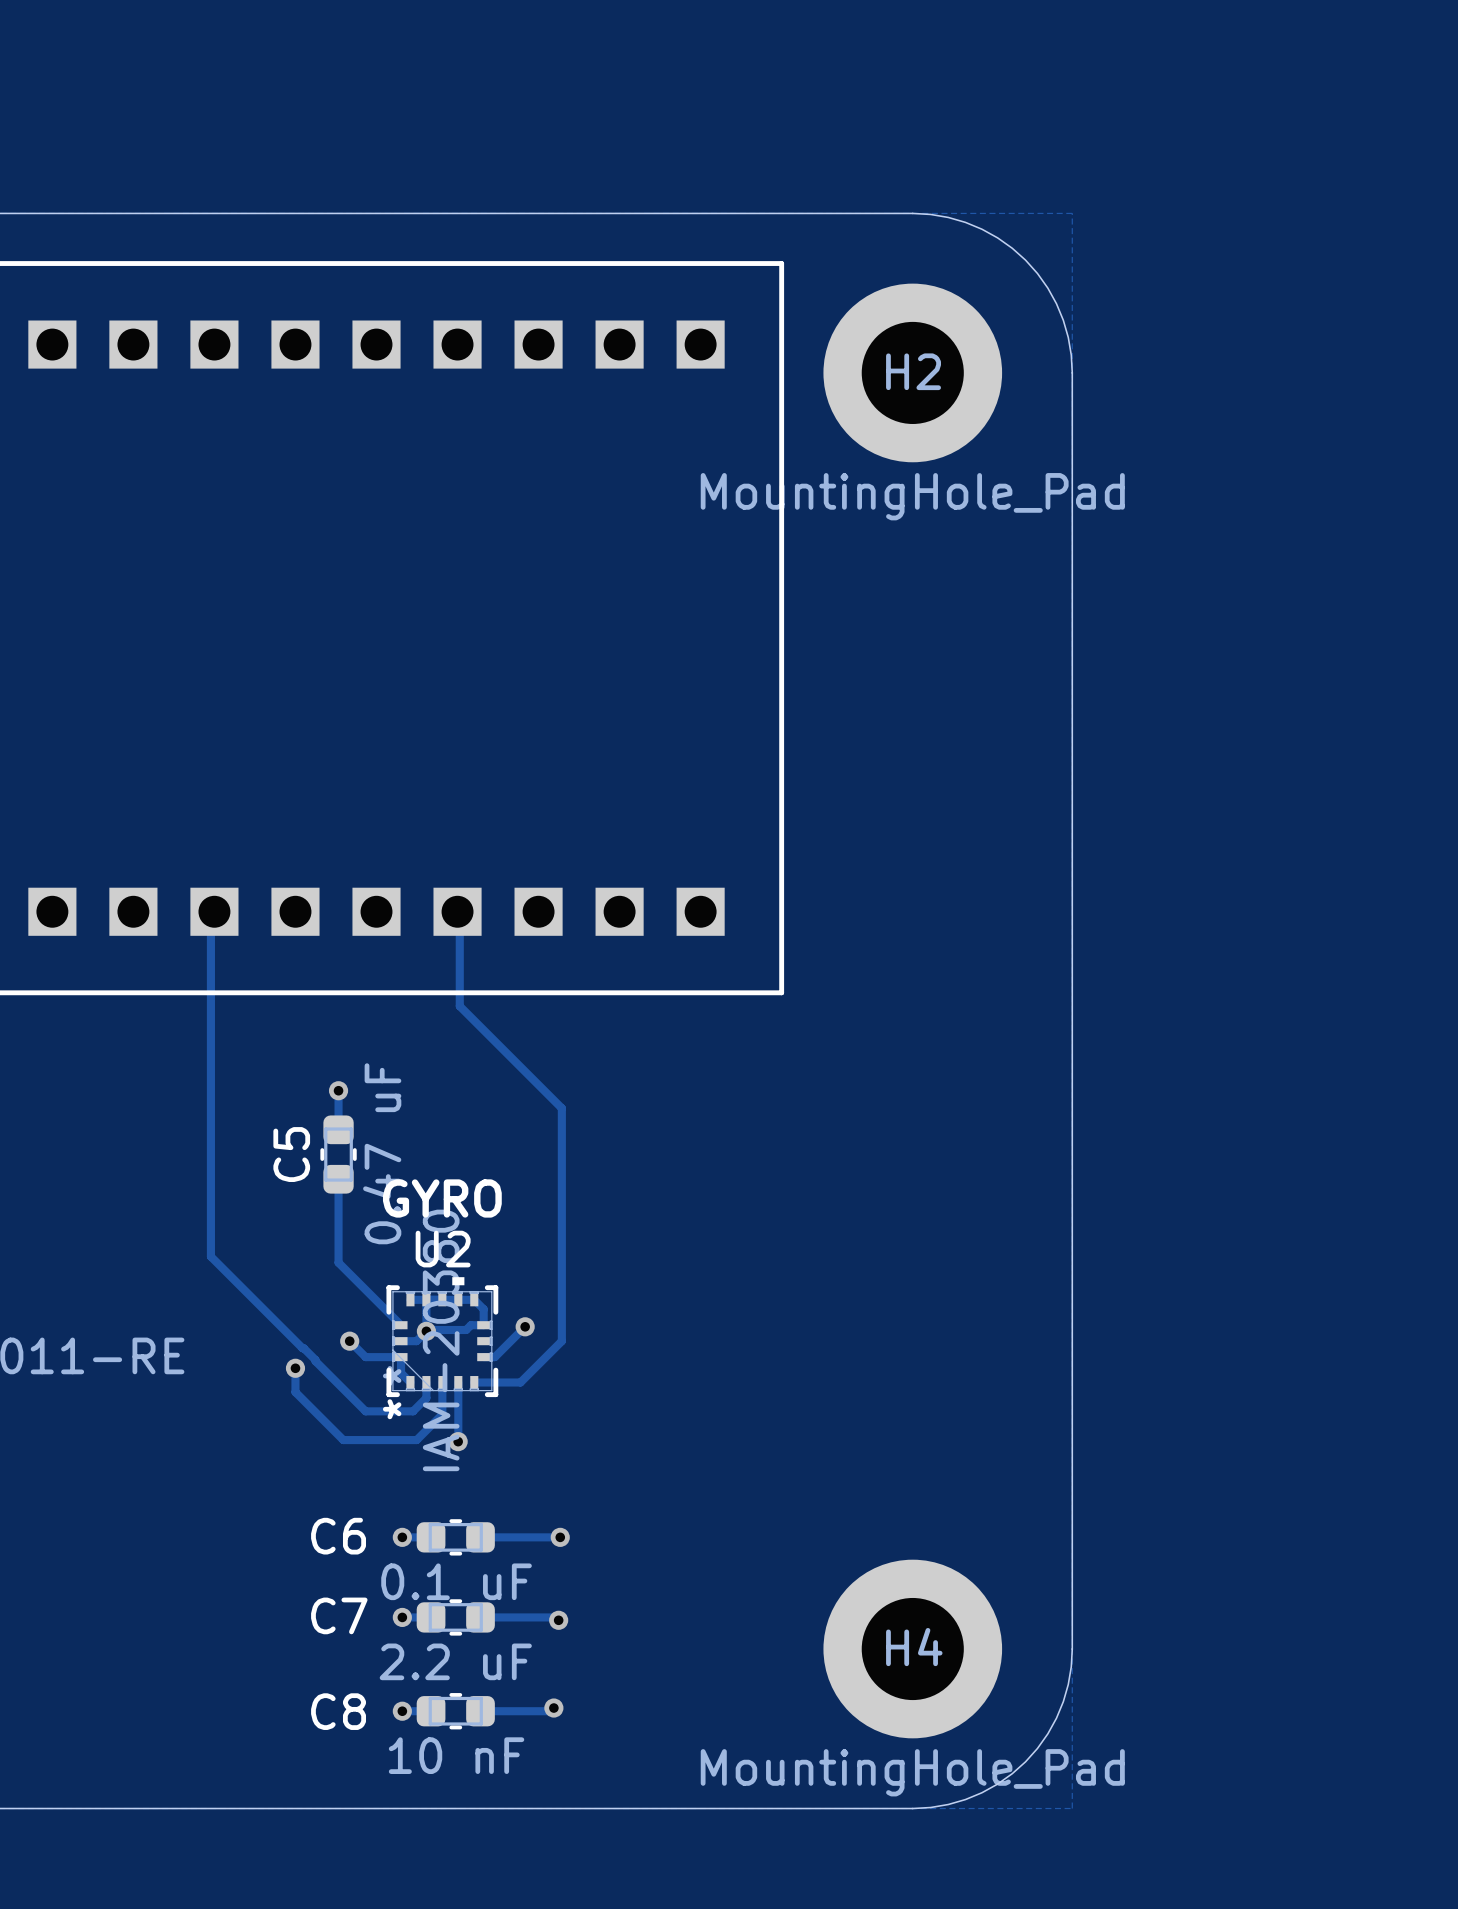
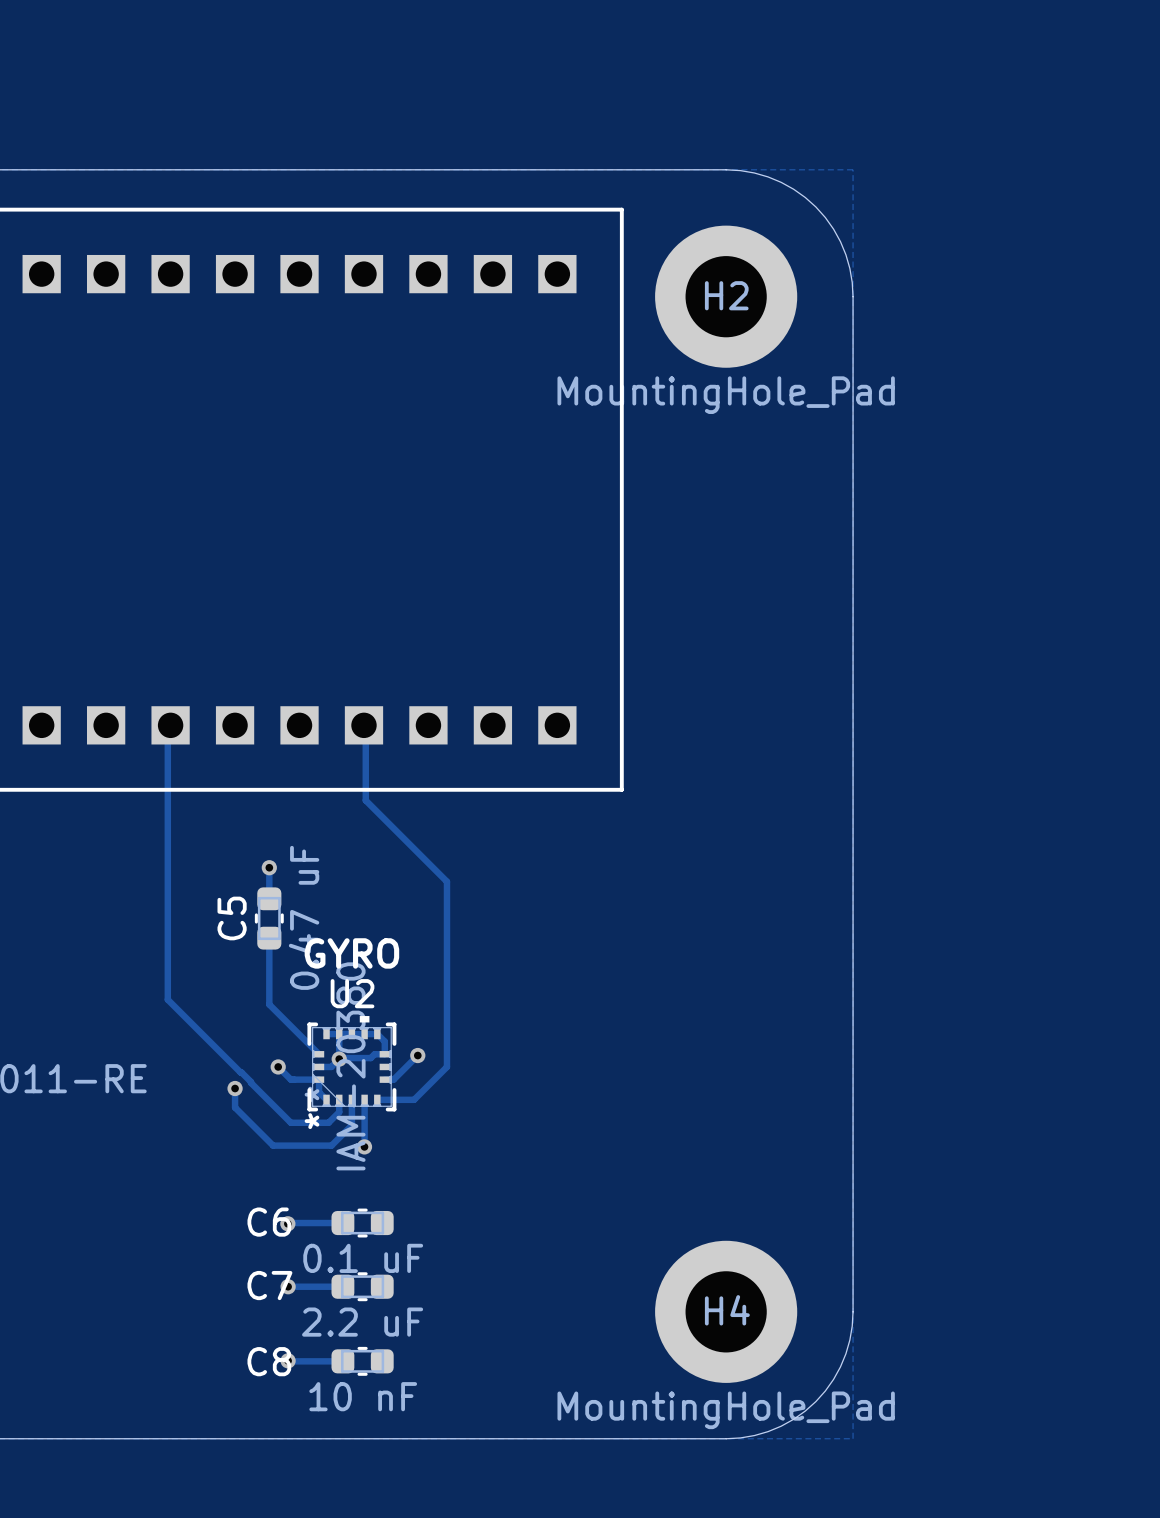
track: none -> (320, 1223) (287, 1223)
via position: (402, 1537) -> (287, 1223)
track: (480, 1537) (561, 1537) -> none
via: (560, 1537) -> none
track: none -> (288, 1286) (320, 1286)
via position: (402, 1617) -> (288, 1286)
track: (480, 1617) (555, 1617) (558, 1620) -> none
via: (558, 1620) -> none
track: (553, 1708) (550, 1711) (480, 1711) -> none
via: (553, 1708) -> none
track: none -> (288, 1360) (320, 1361)
via position: (402, 1711) -> (288, 1360)

